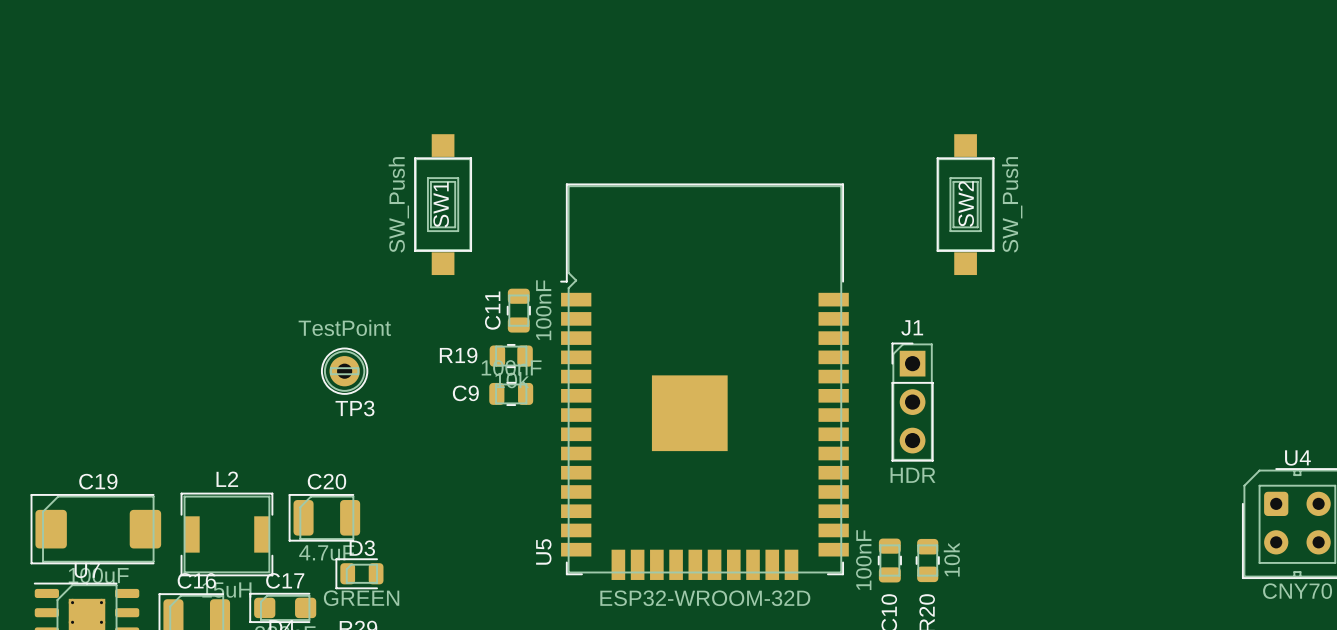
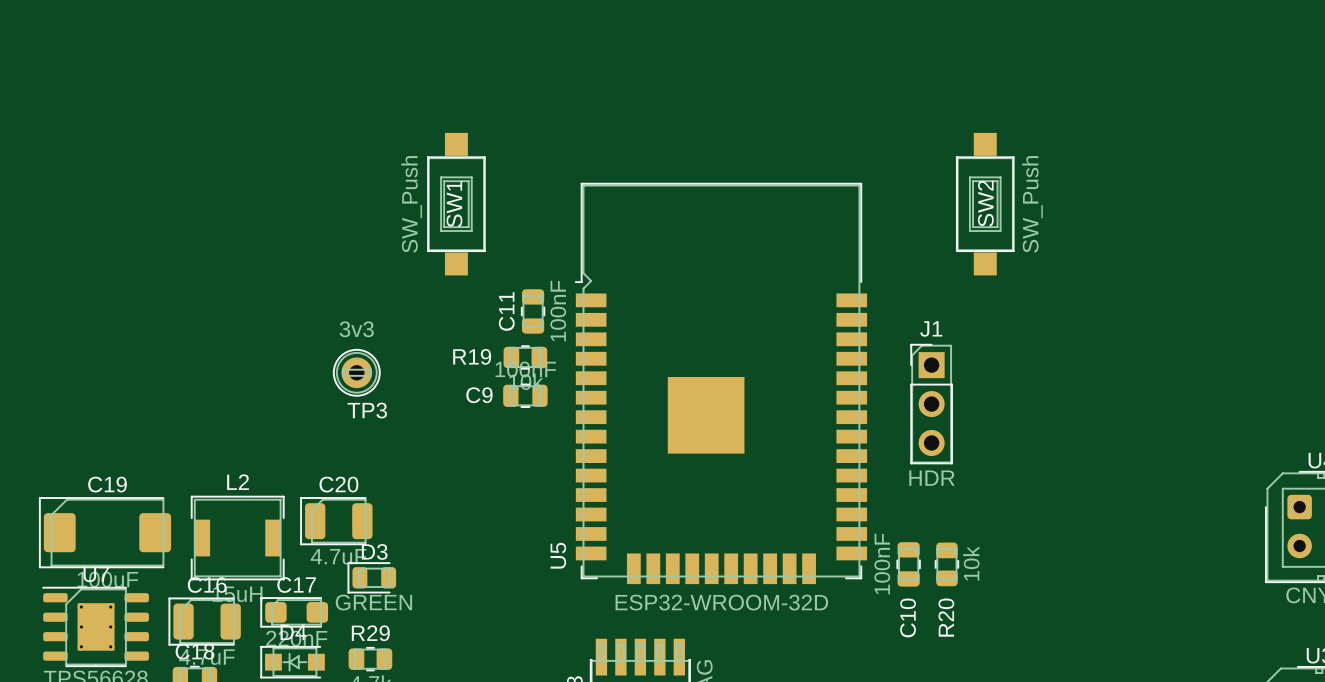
TP3 value: TestPoint (344, 327) -> 3v3 (356, 329)

